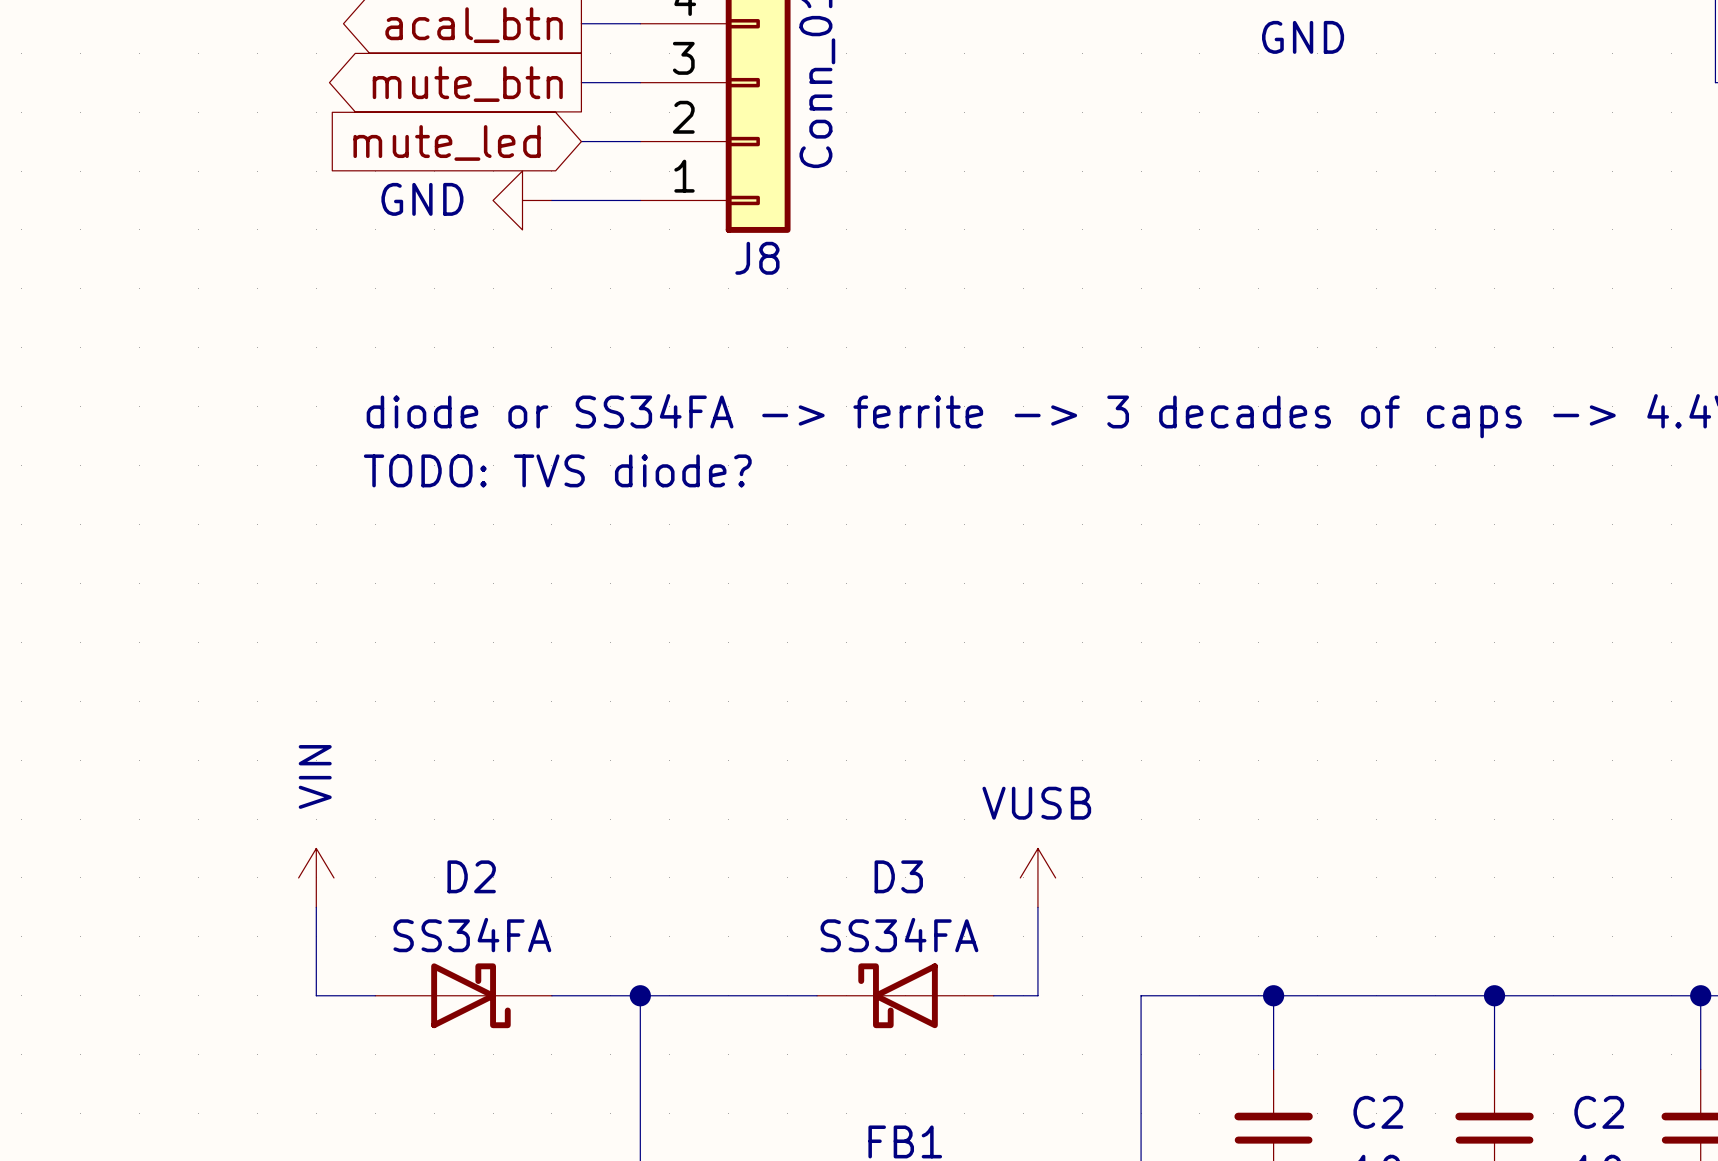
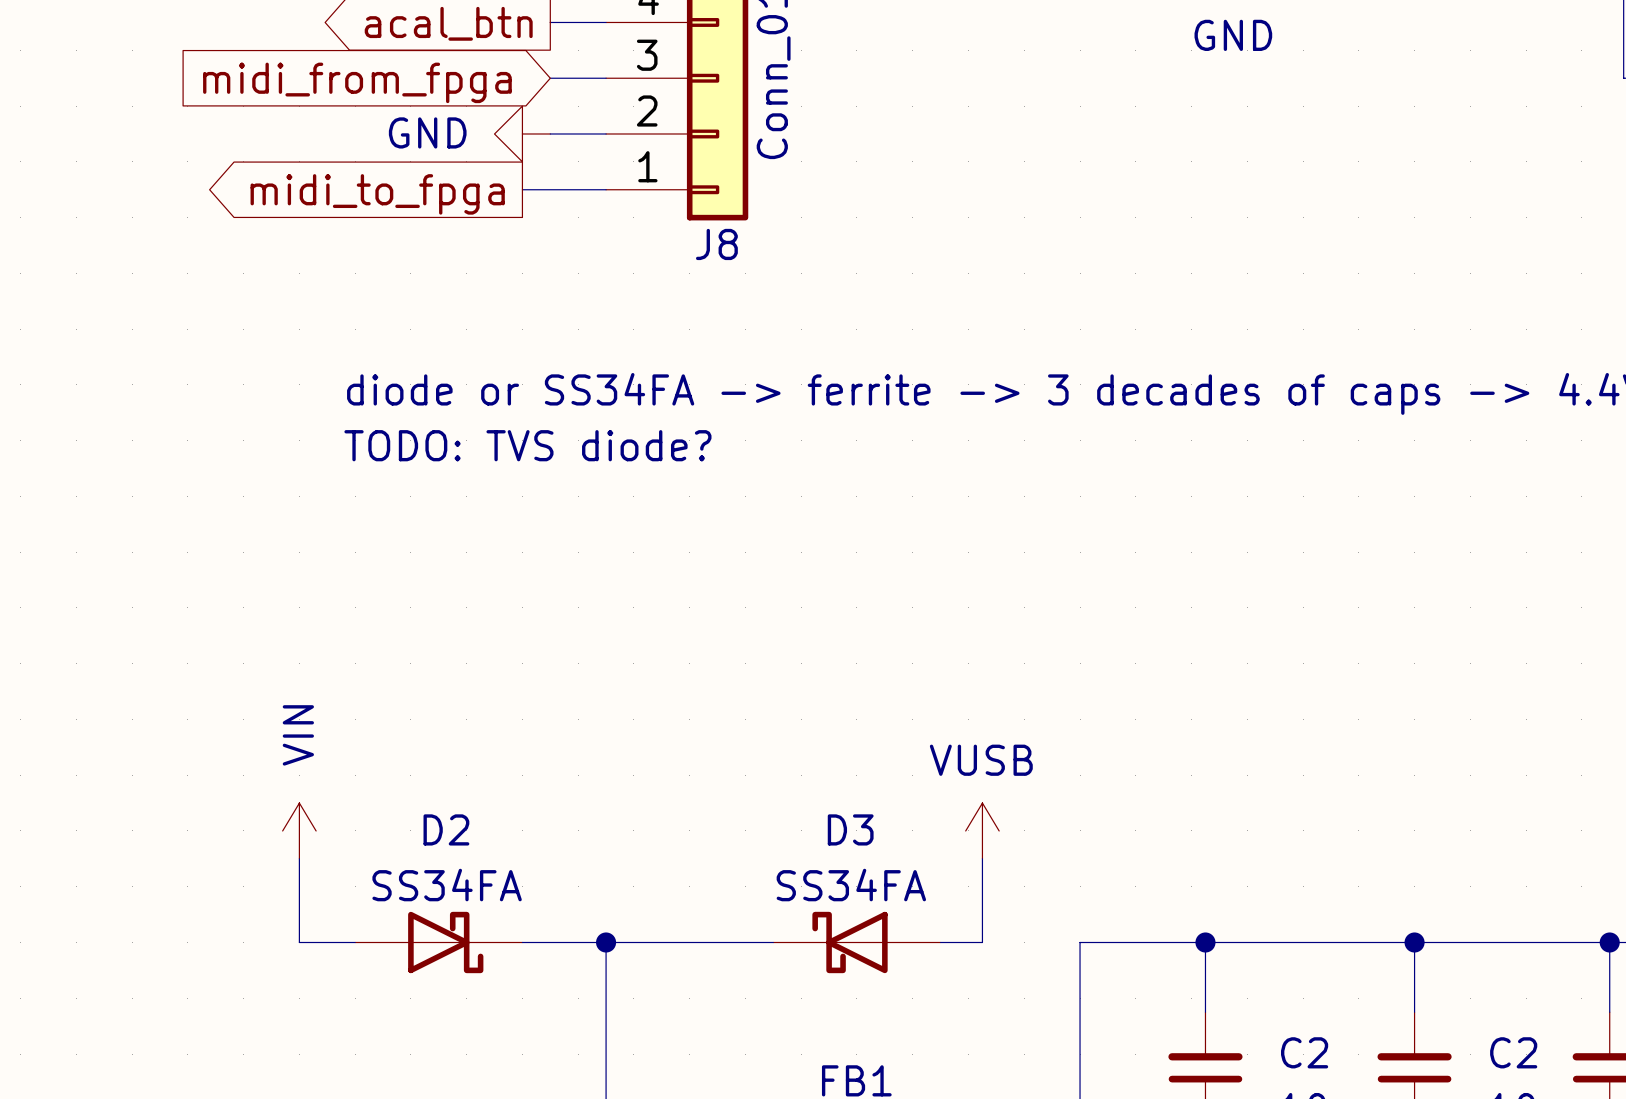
global label shape: output (467, 84) -> input (357, 82)
global label: mute_btn (467, 84) -> midi_from_fpga (357, 82)
global label: mute_led (447, 142) -> none
power symbol position: GND (522, 200) -> GND (522, 133)
global label: none -> midi_to_fpga (377, 194)

